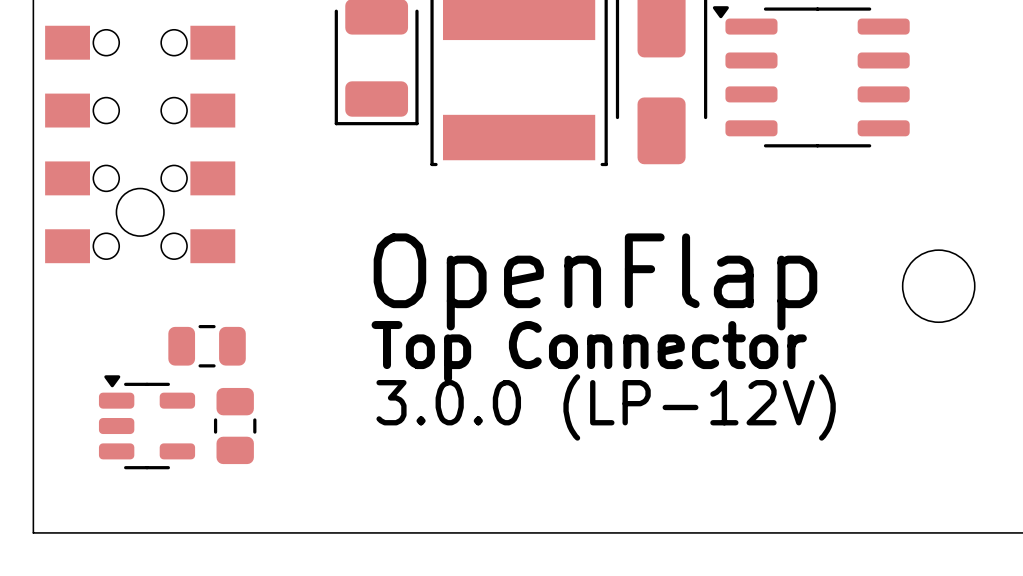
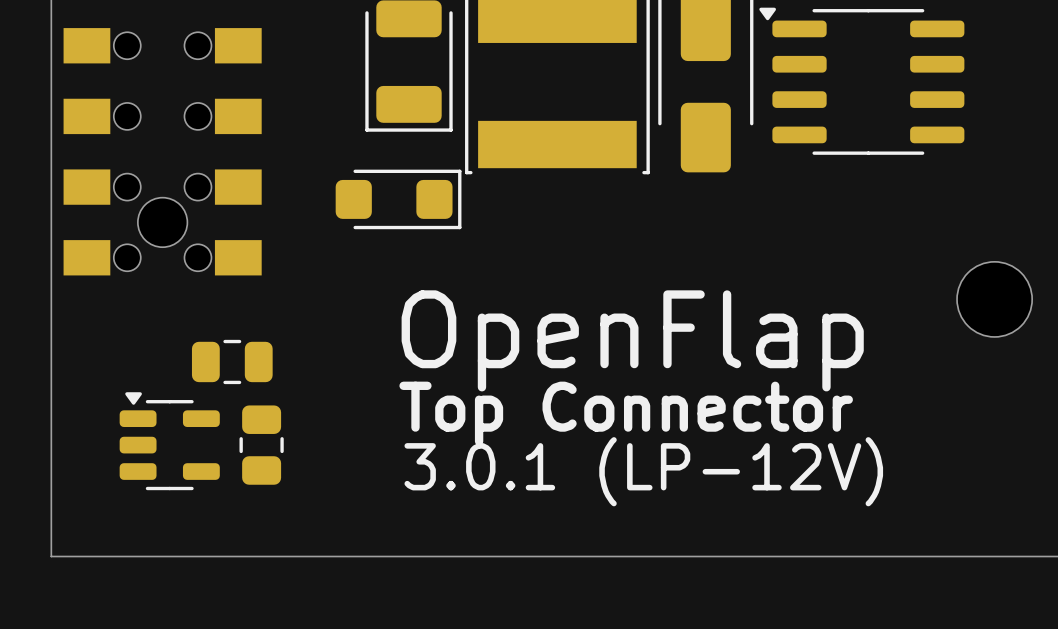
part: none -> (398, 199)
text: OpenFlap (595, 281) -> none
text: Top Connector (589, 351) -> OpenFlap (632, 340)
text: 3.0.0 (LP-12V) (606, 407) -> Top Connector (626, 413)
text: none -> 3.0.1 (LP-12V) (643, 471)

